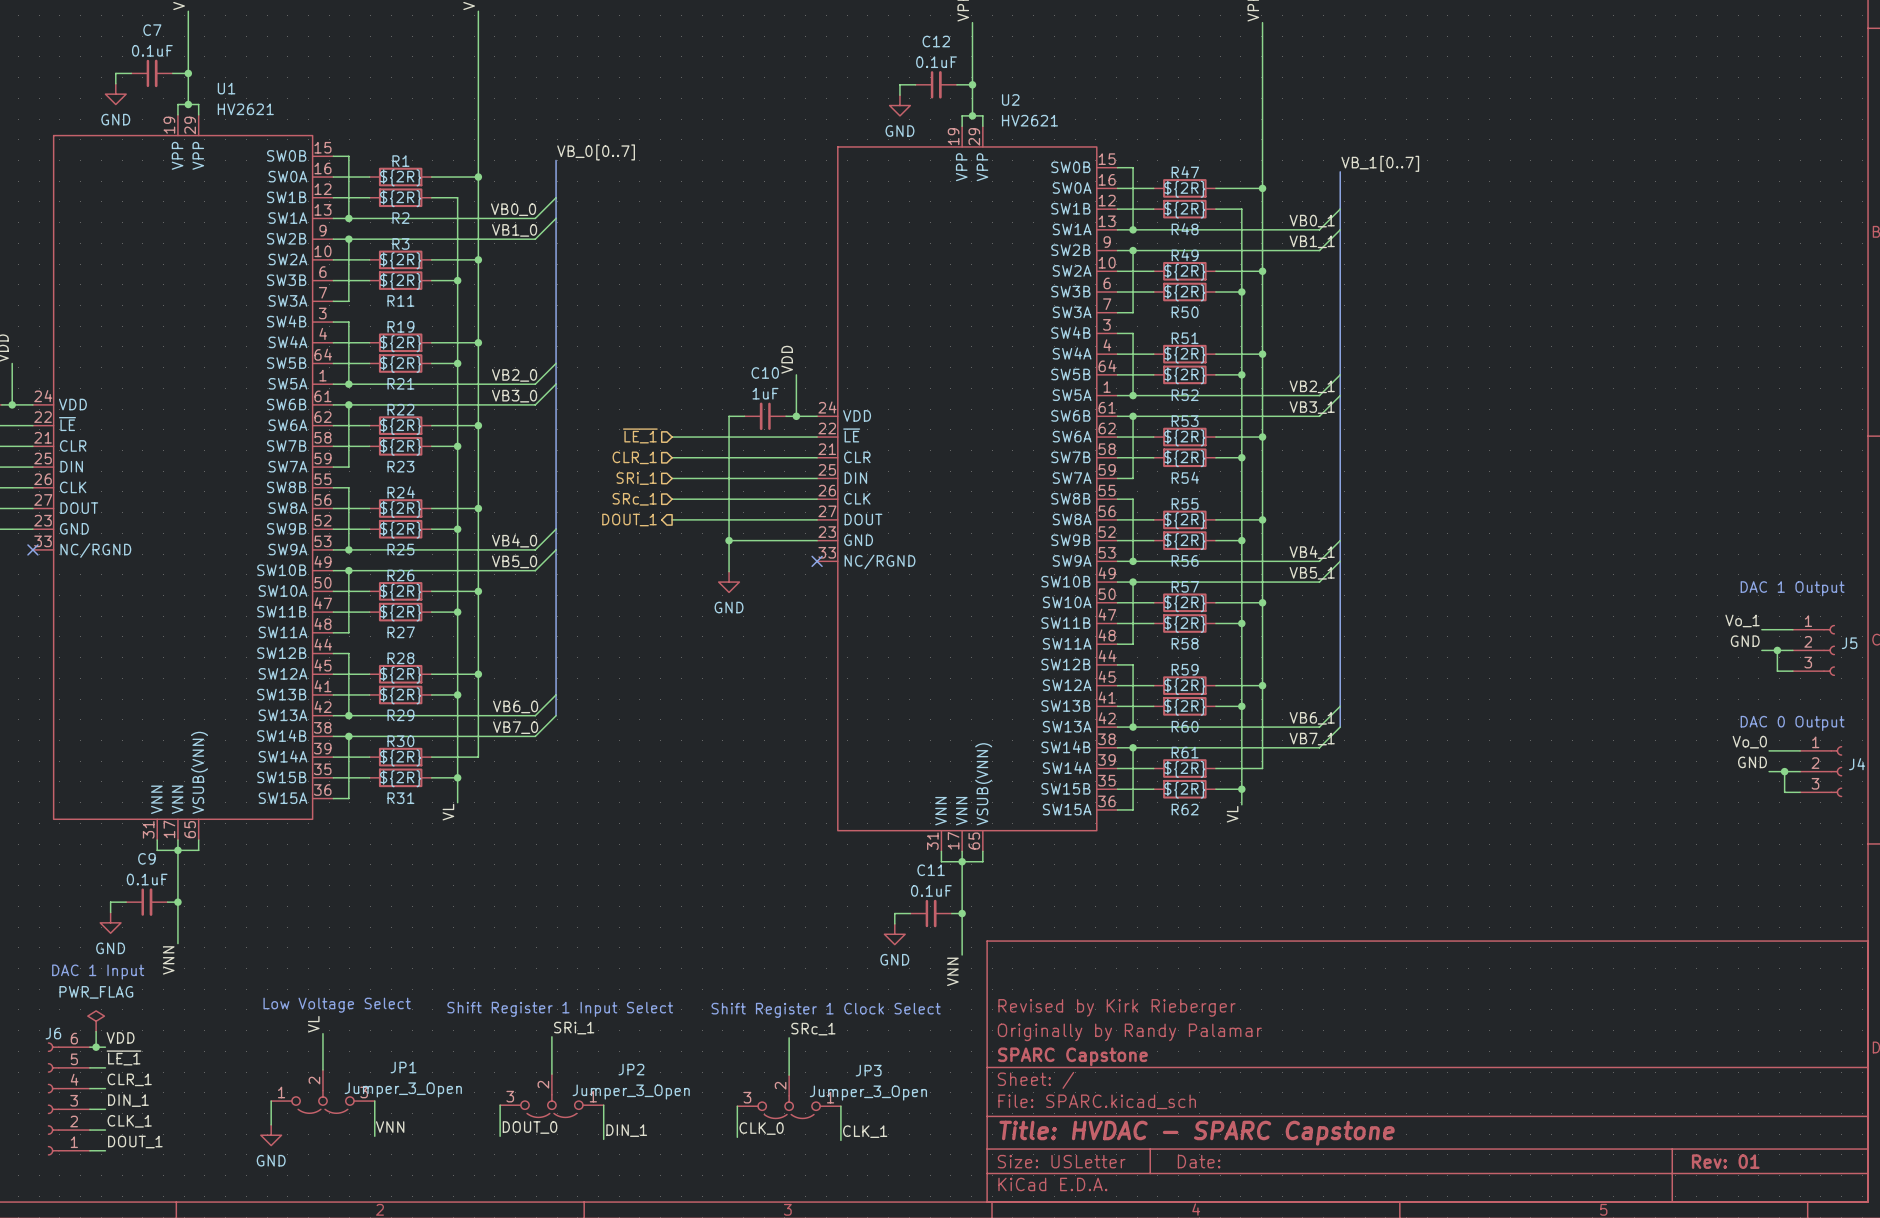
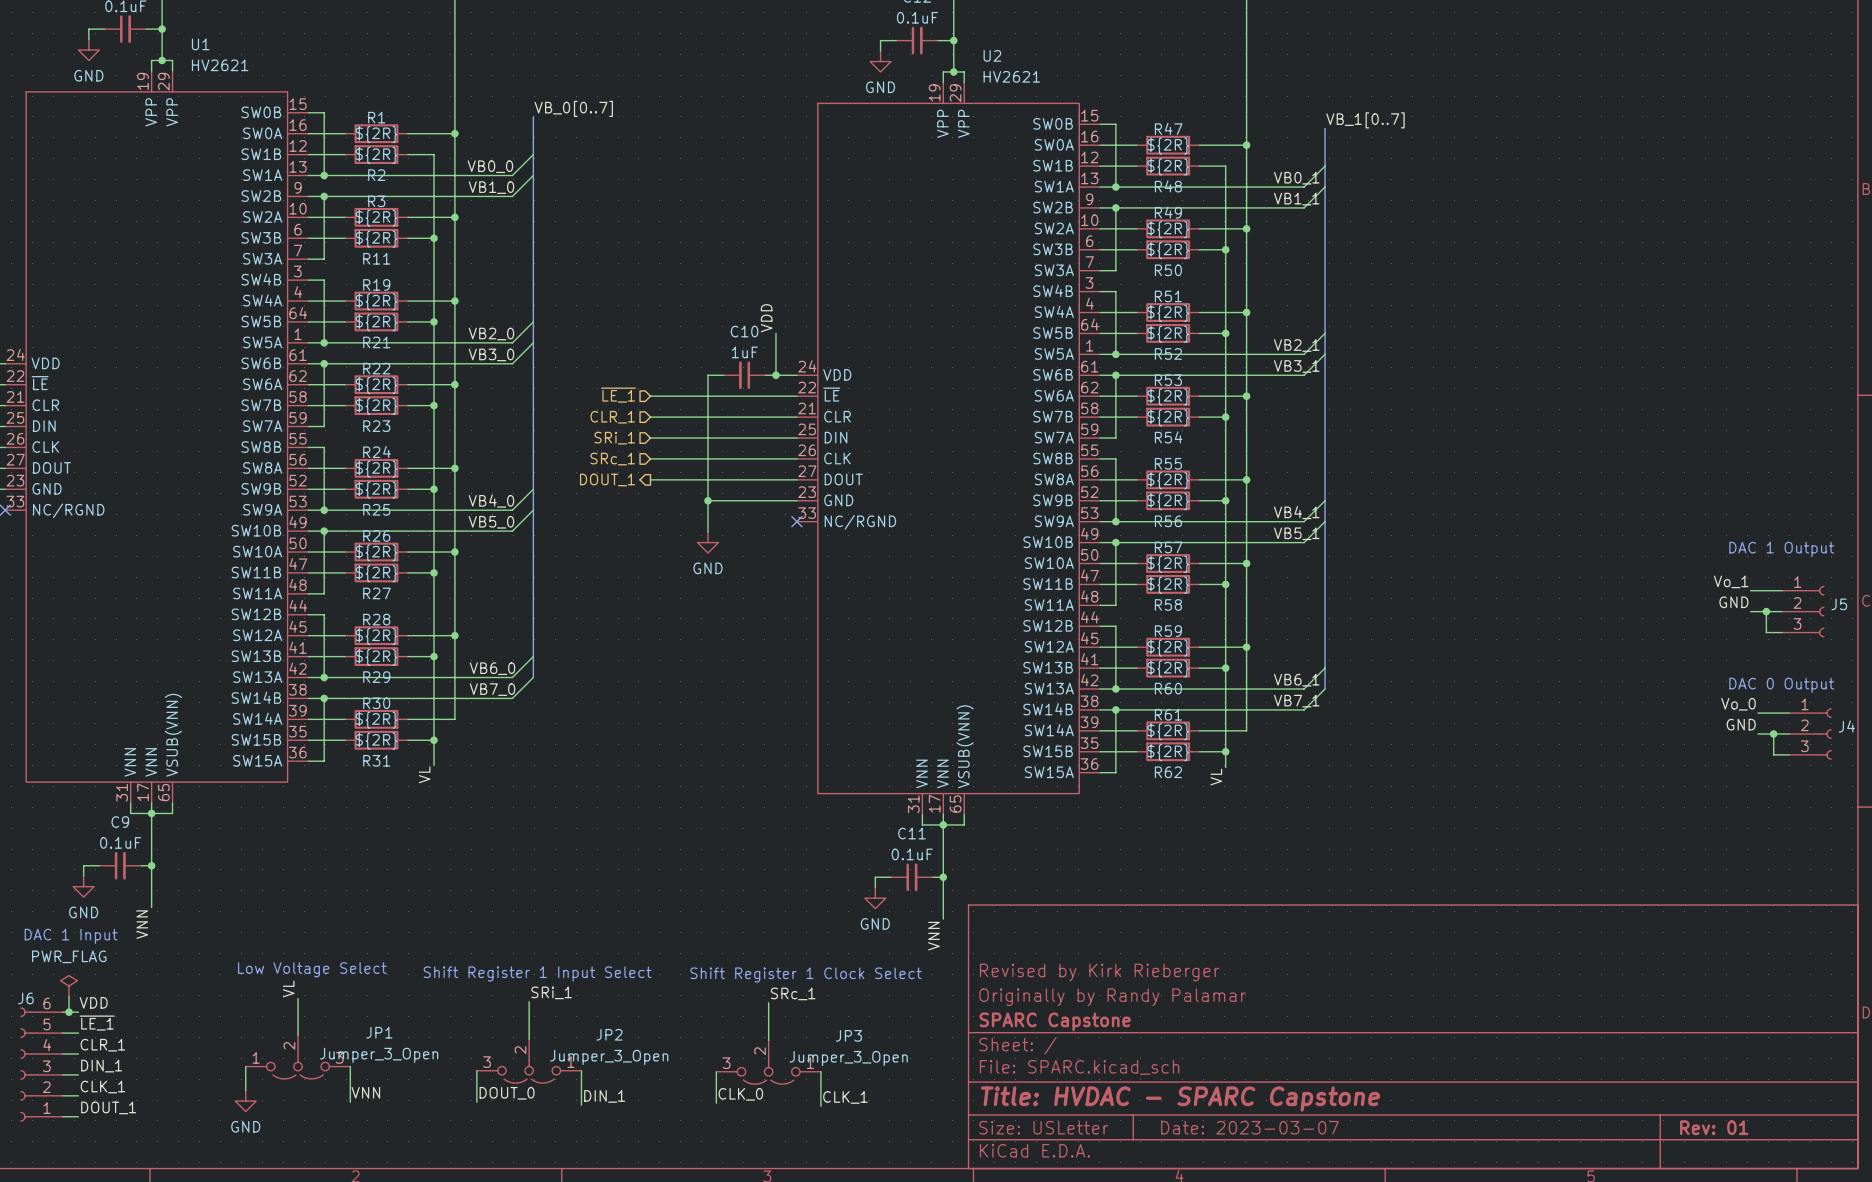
title block: Date: (1199, 1161) -> Date: 2023-03-07 (1249, 1127)

